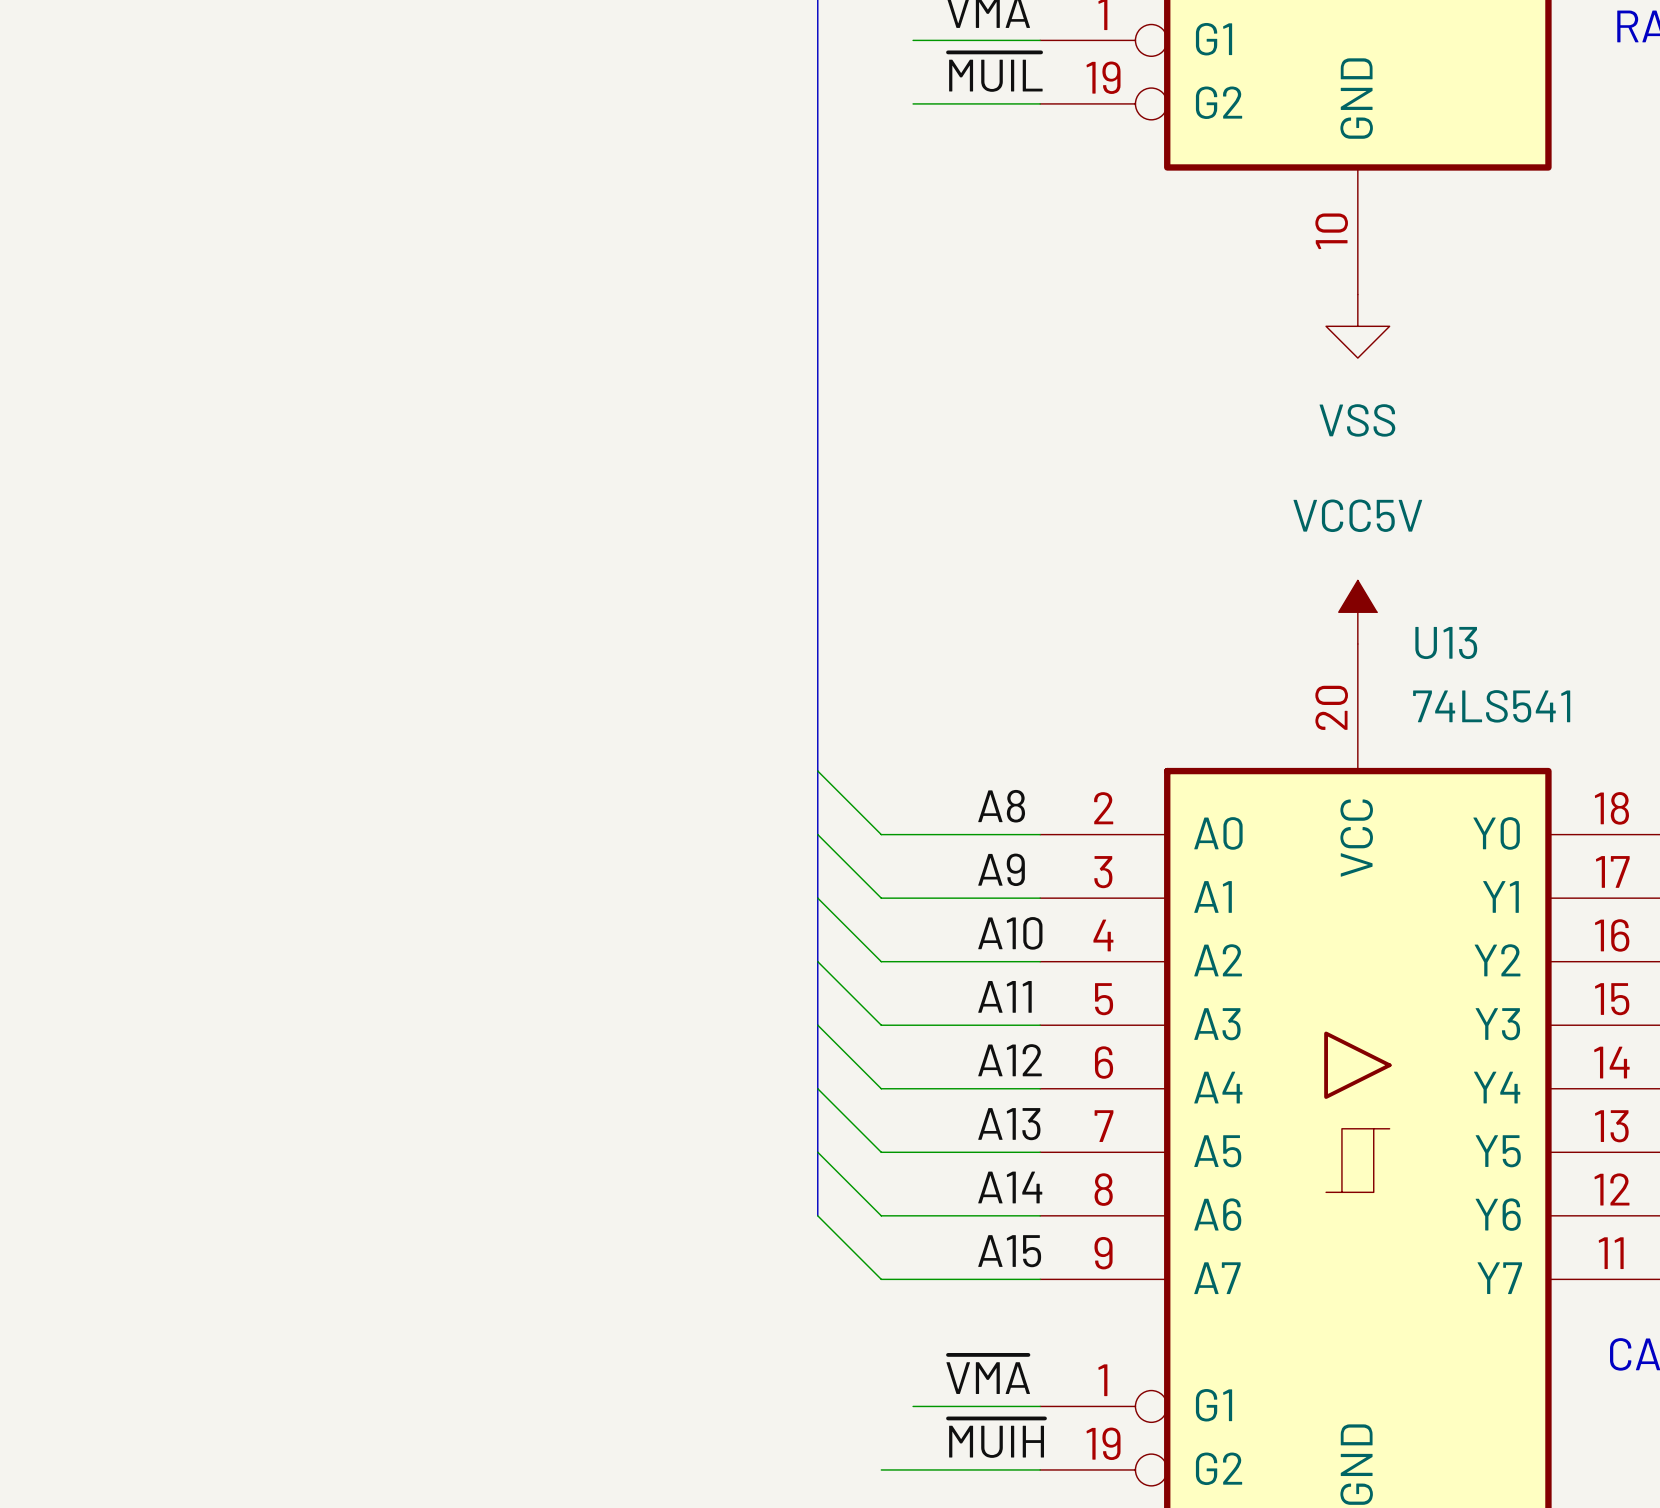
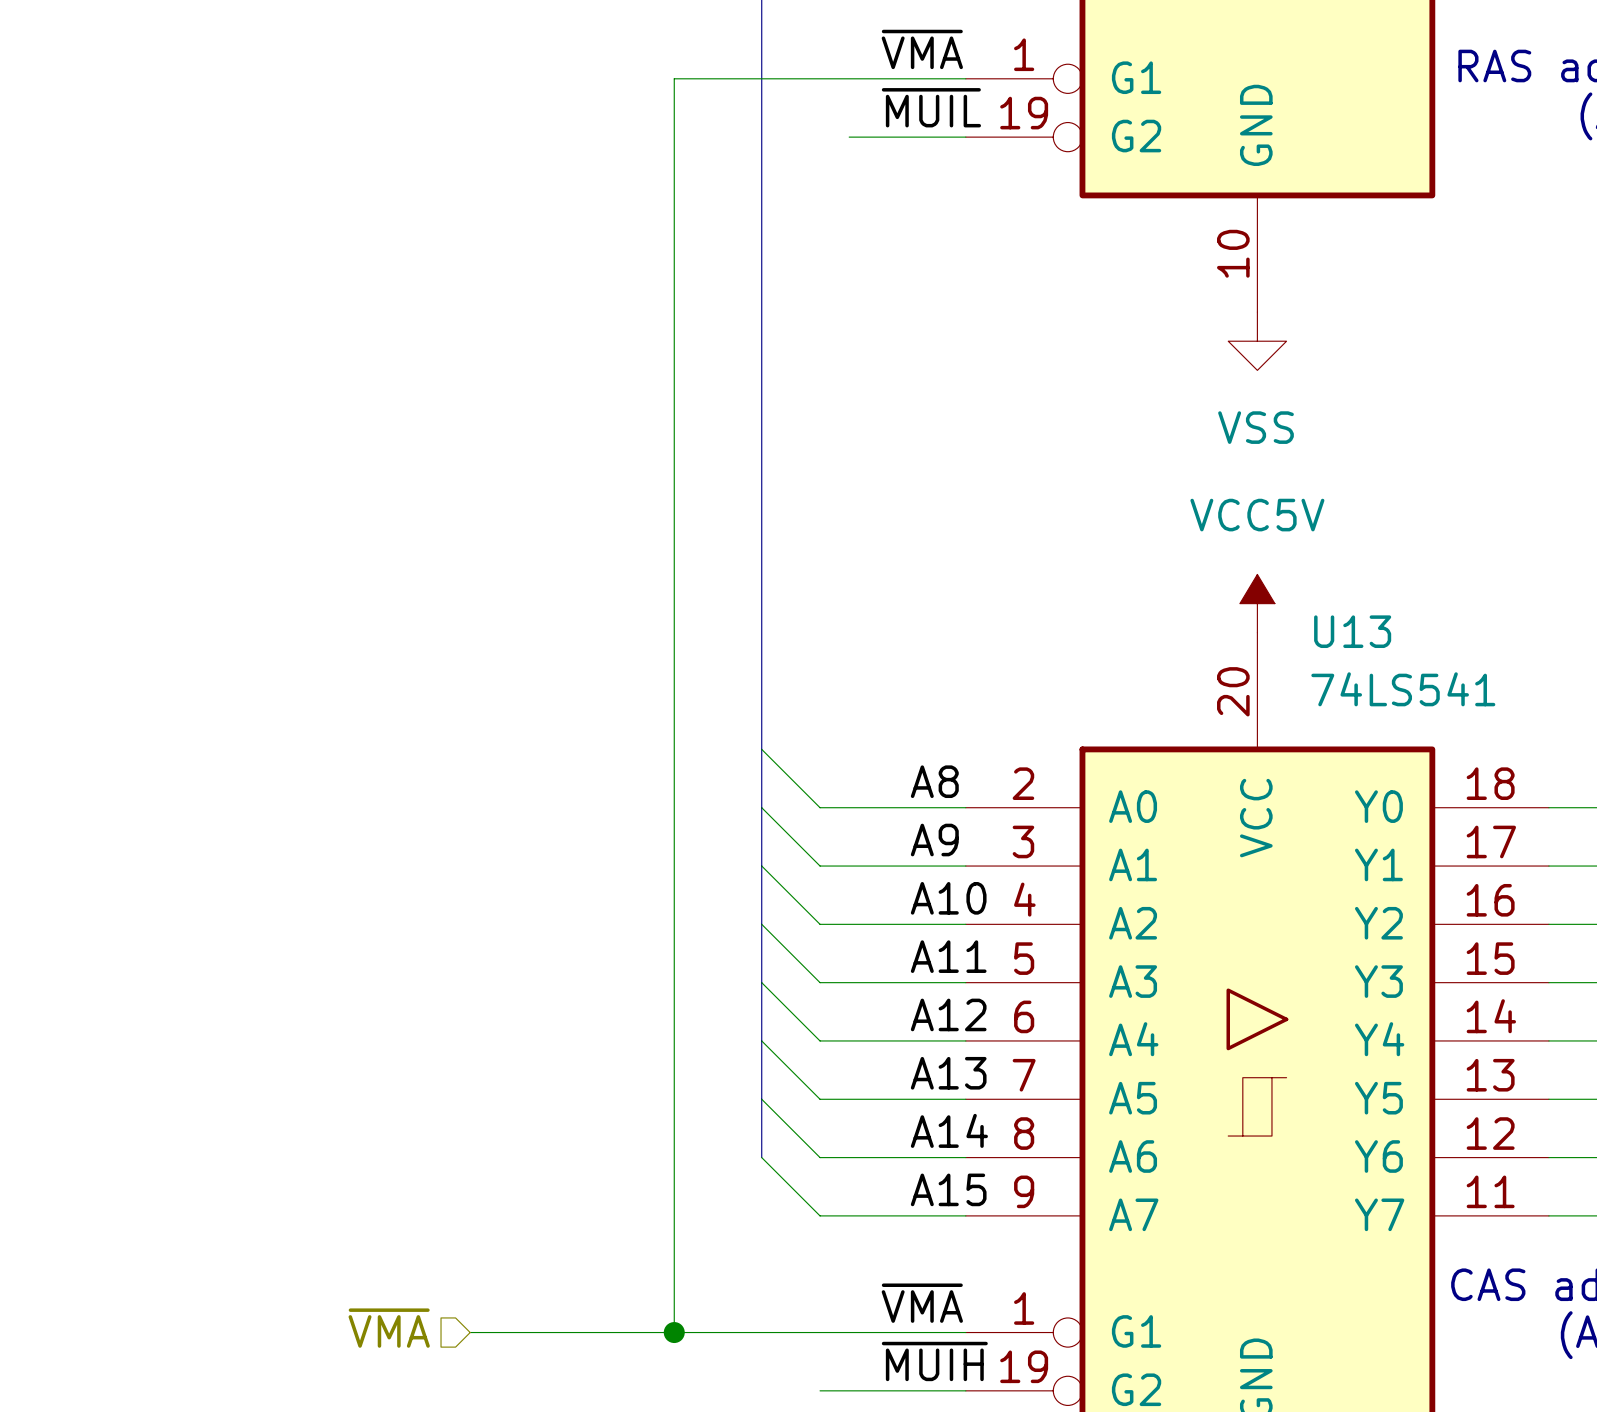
wire: none -> (849, 78) (674, 78) (674, 1332)
hierarchical label: none -> ~{VMA} (389, 1328)
wire: none -> (470, 1332) (849, 1332)
junction: none -> (674, 1332)

